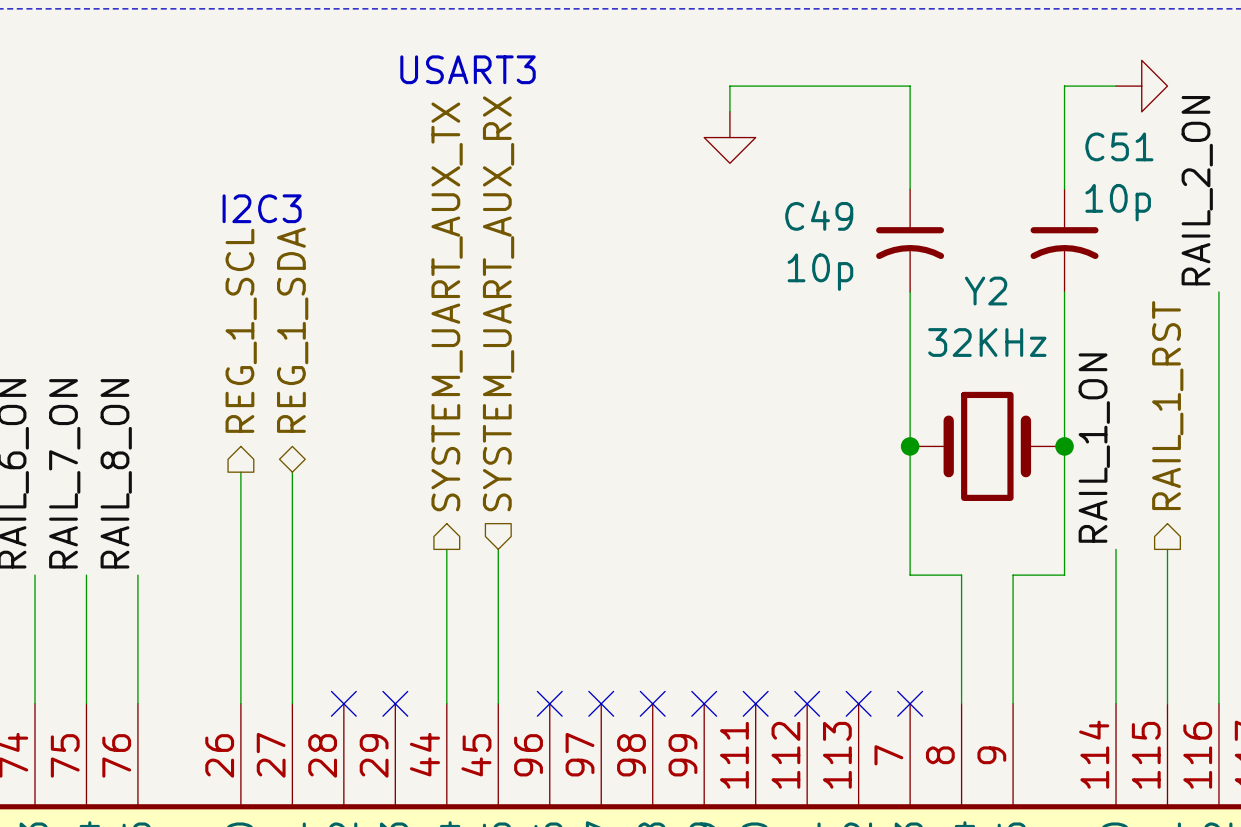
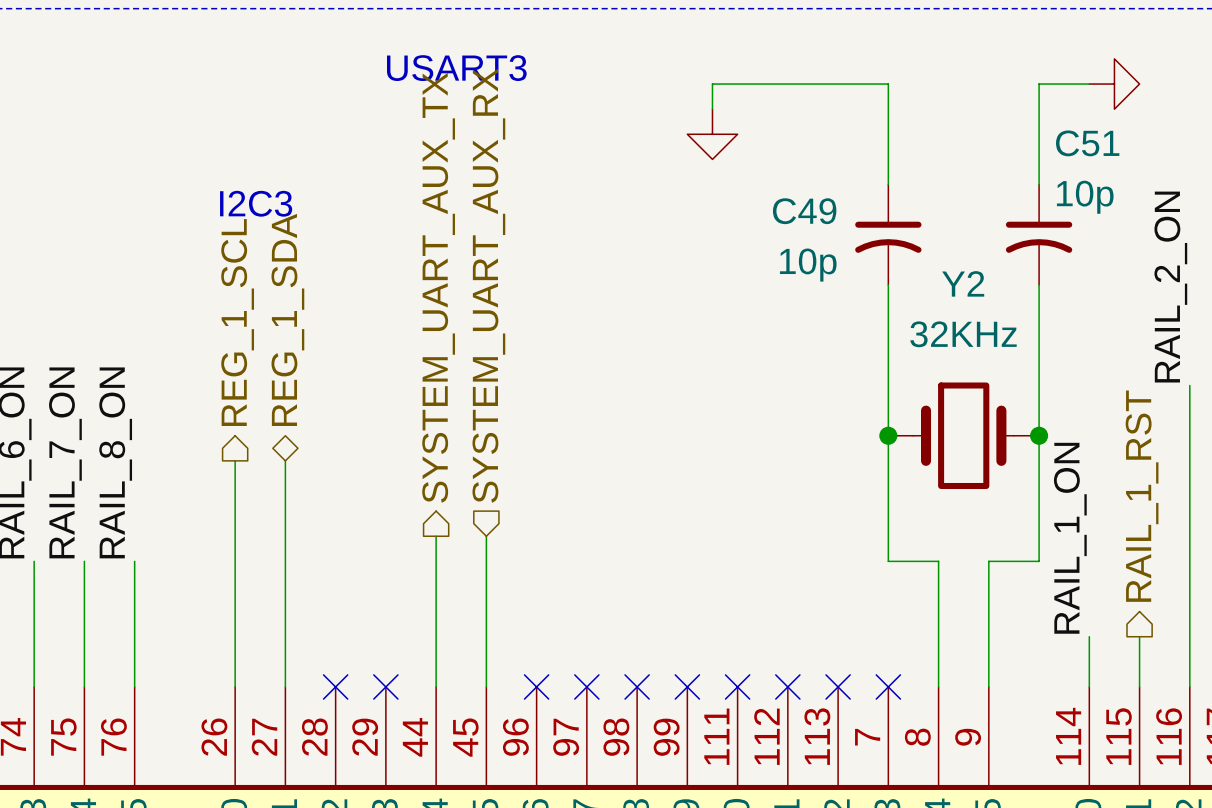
label position: RAIL_2_ON (1197, 190) -> RAIL_2_ON (1170, 287)
wire: (1218, 291) (1218, 394) -> none
hierarchical label position: RAIL_1_RST (1167, 405) -> RAIL_1_RST (1142, 496)
label position: RAIL_1_ON (1094, 448) -> RAIL_1_ON (1070, 538)
wire: (1116, 549) (1116, 652) -> none
wire: (1167, 549) (1167, 652) -> none

